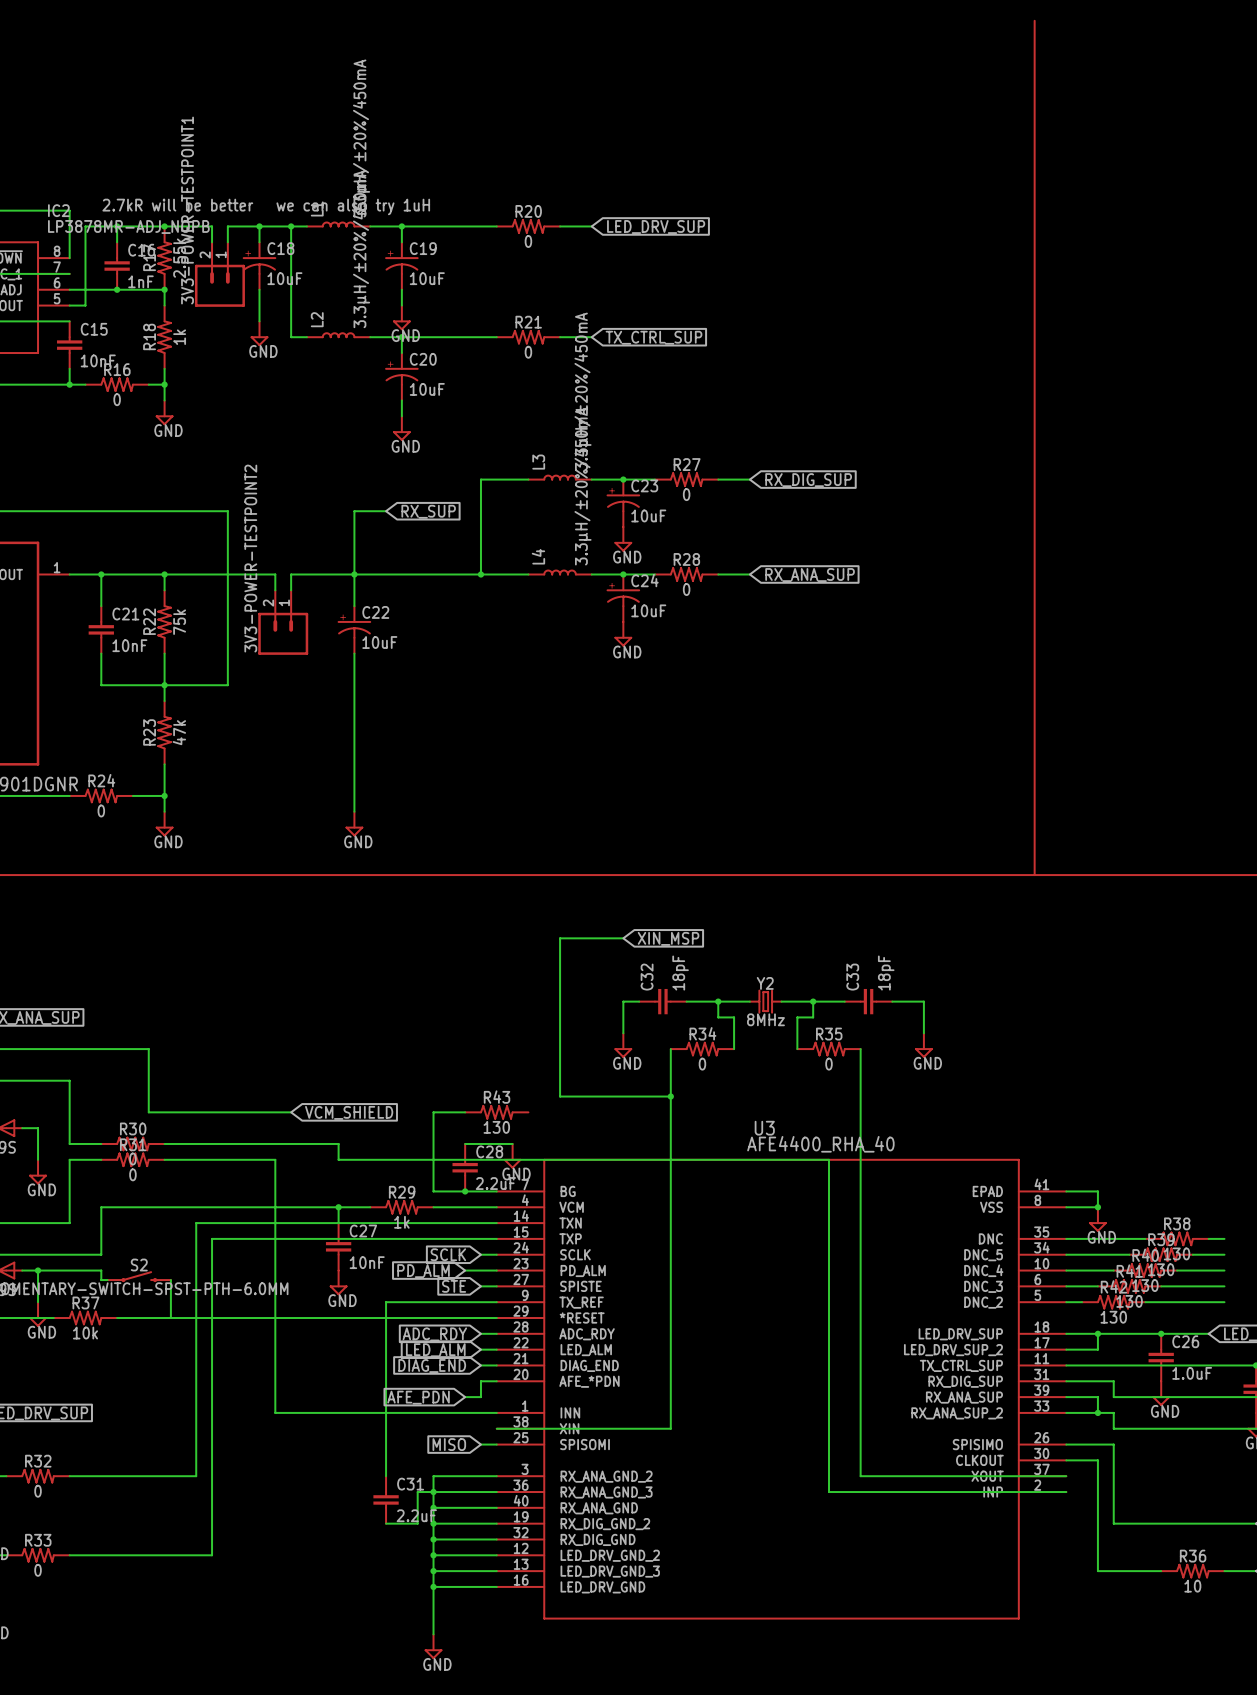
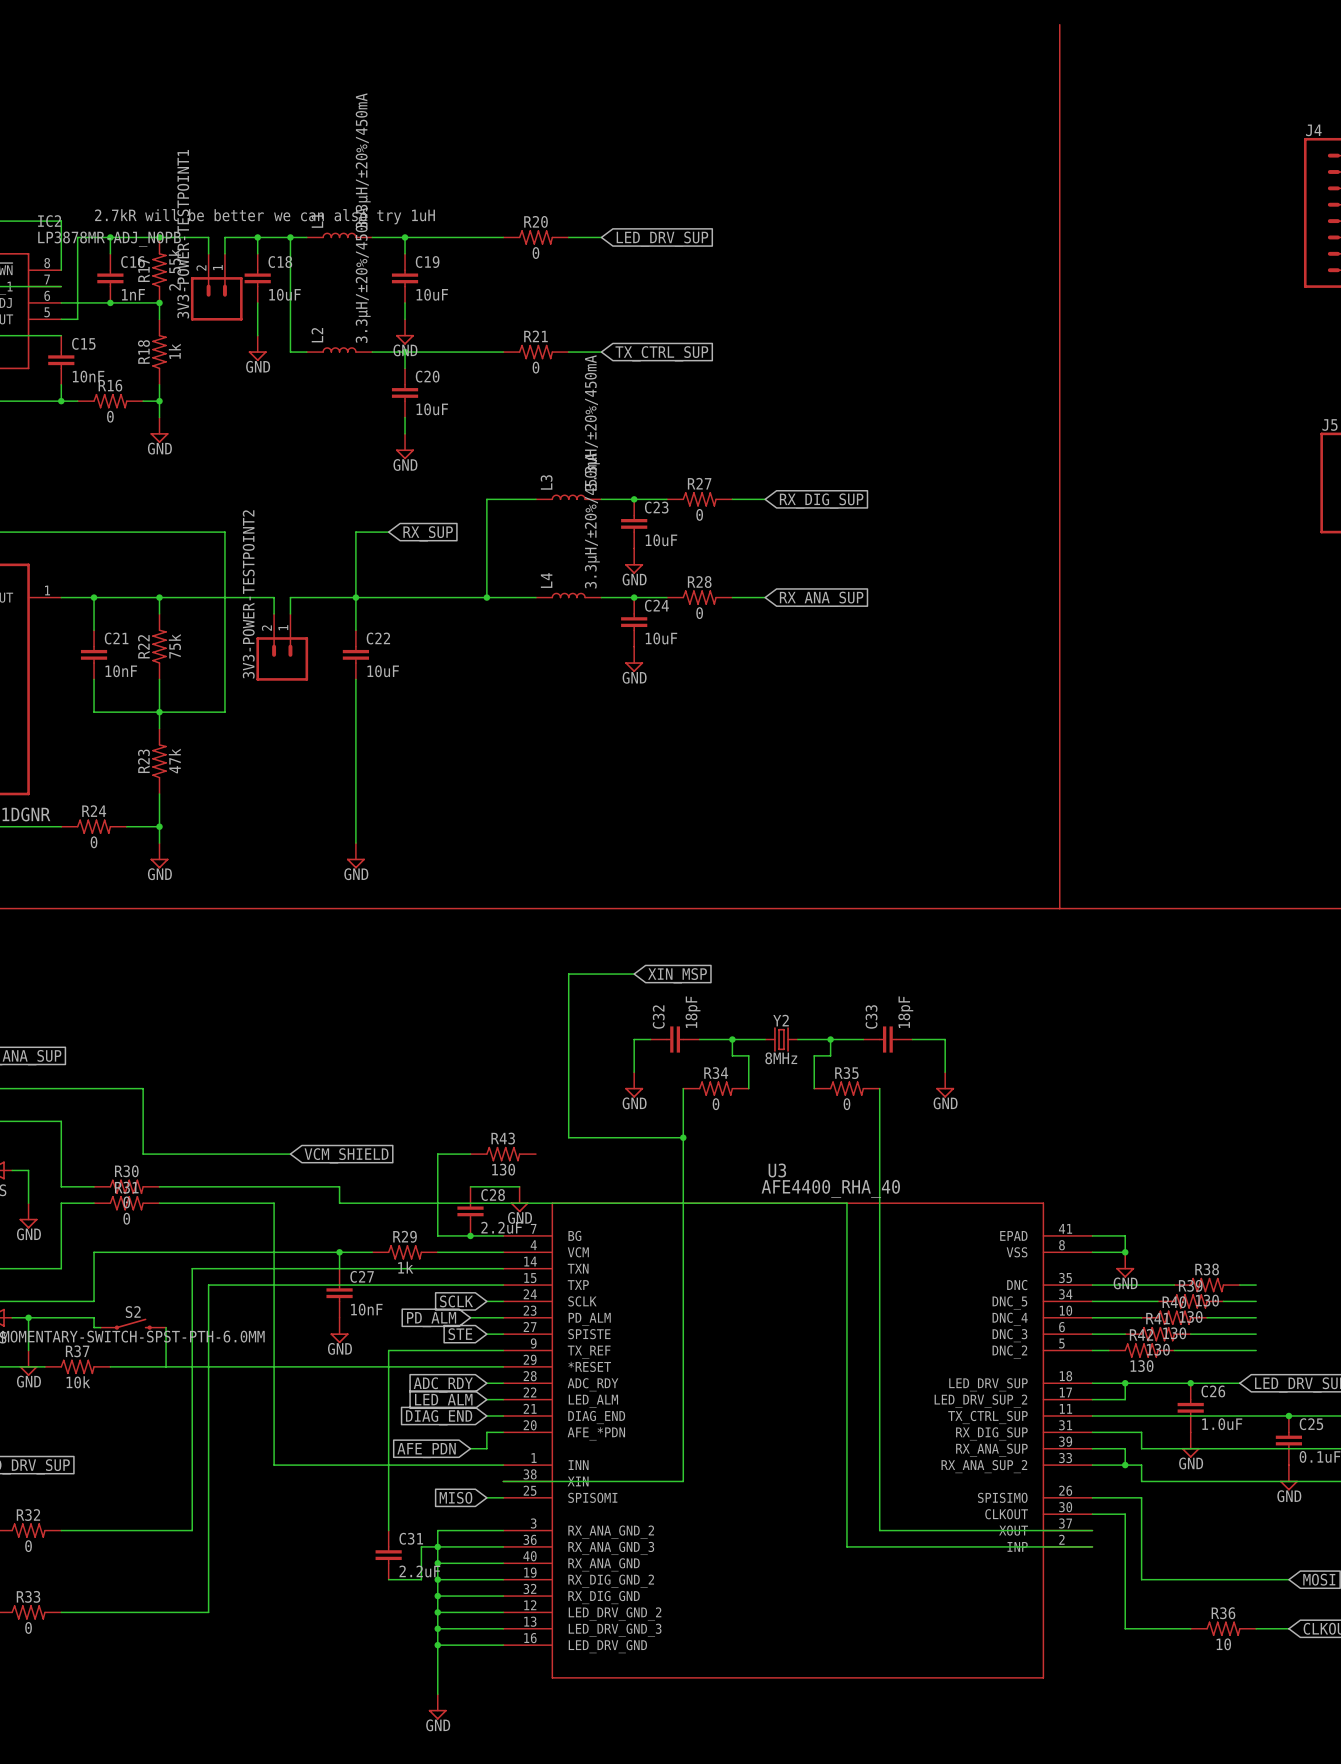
C18 symbol: [242, 242, 277, 290] -> [244, 253, 271, 303]
C19 symbol: [385, 242, 419, 290] -> [391, 253, 419, 303]
C20 symbol: [385, 353, 419, 401] -> [391, 368, 419, 418]
C23 symbol: [606, 479, 640, 528] -> [621, 499, 648, 549]
C24 symbol: [606, 574, 640, 622] -> [621, 597, 648, 647]
C22 symbol: [337, 606, 372, 654] -> [342, 630, 370, 680]

